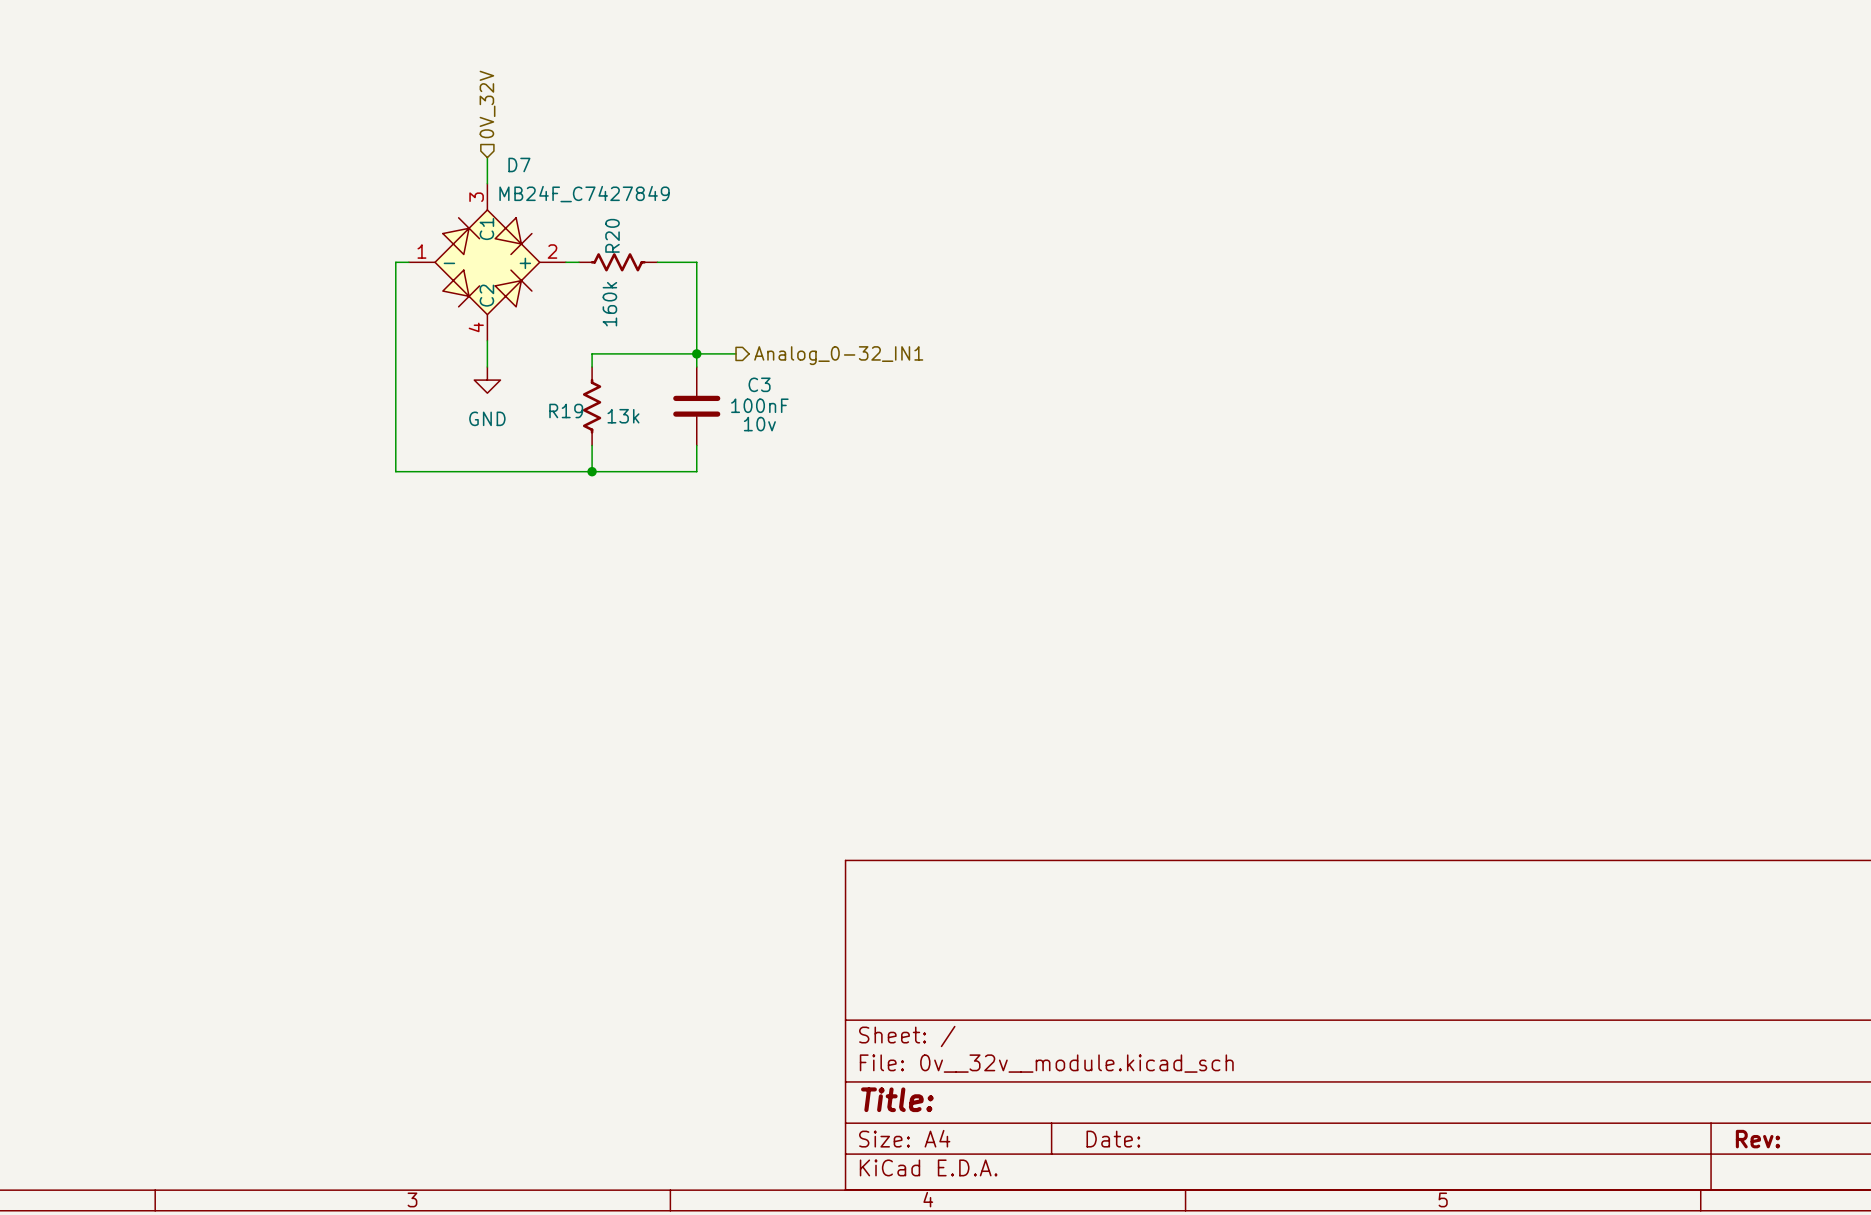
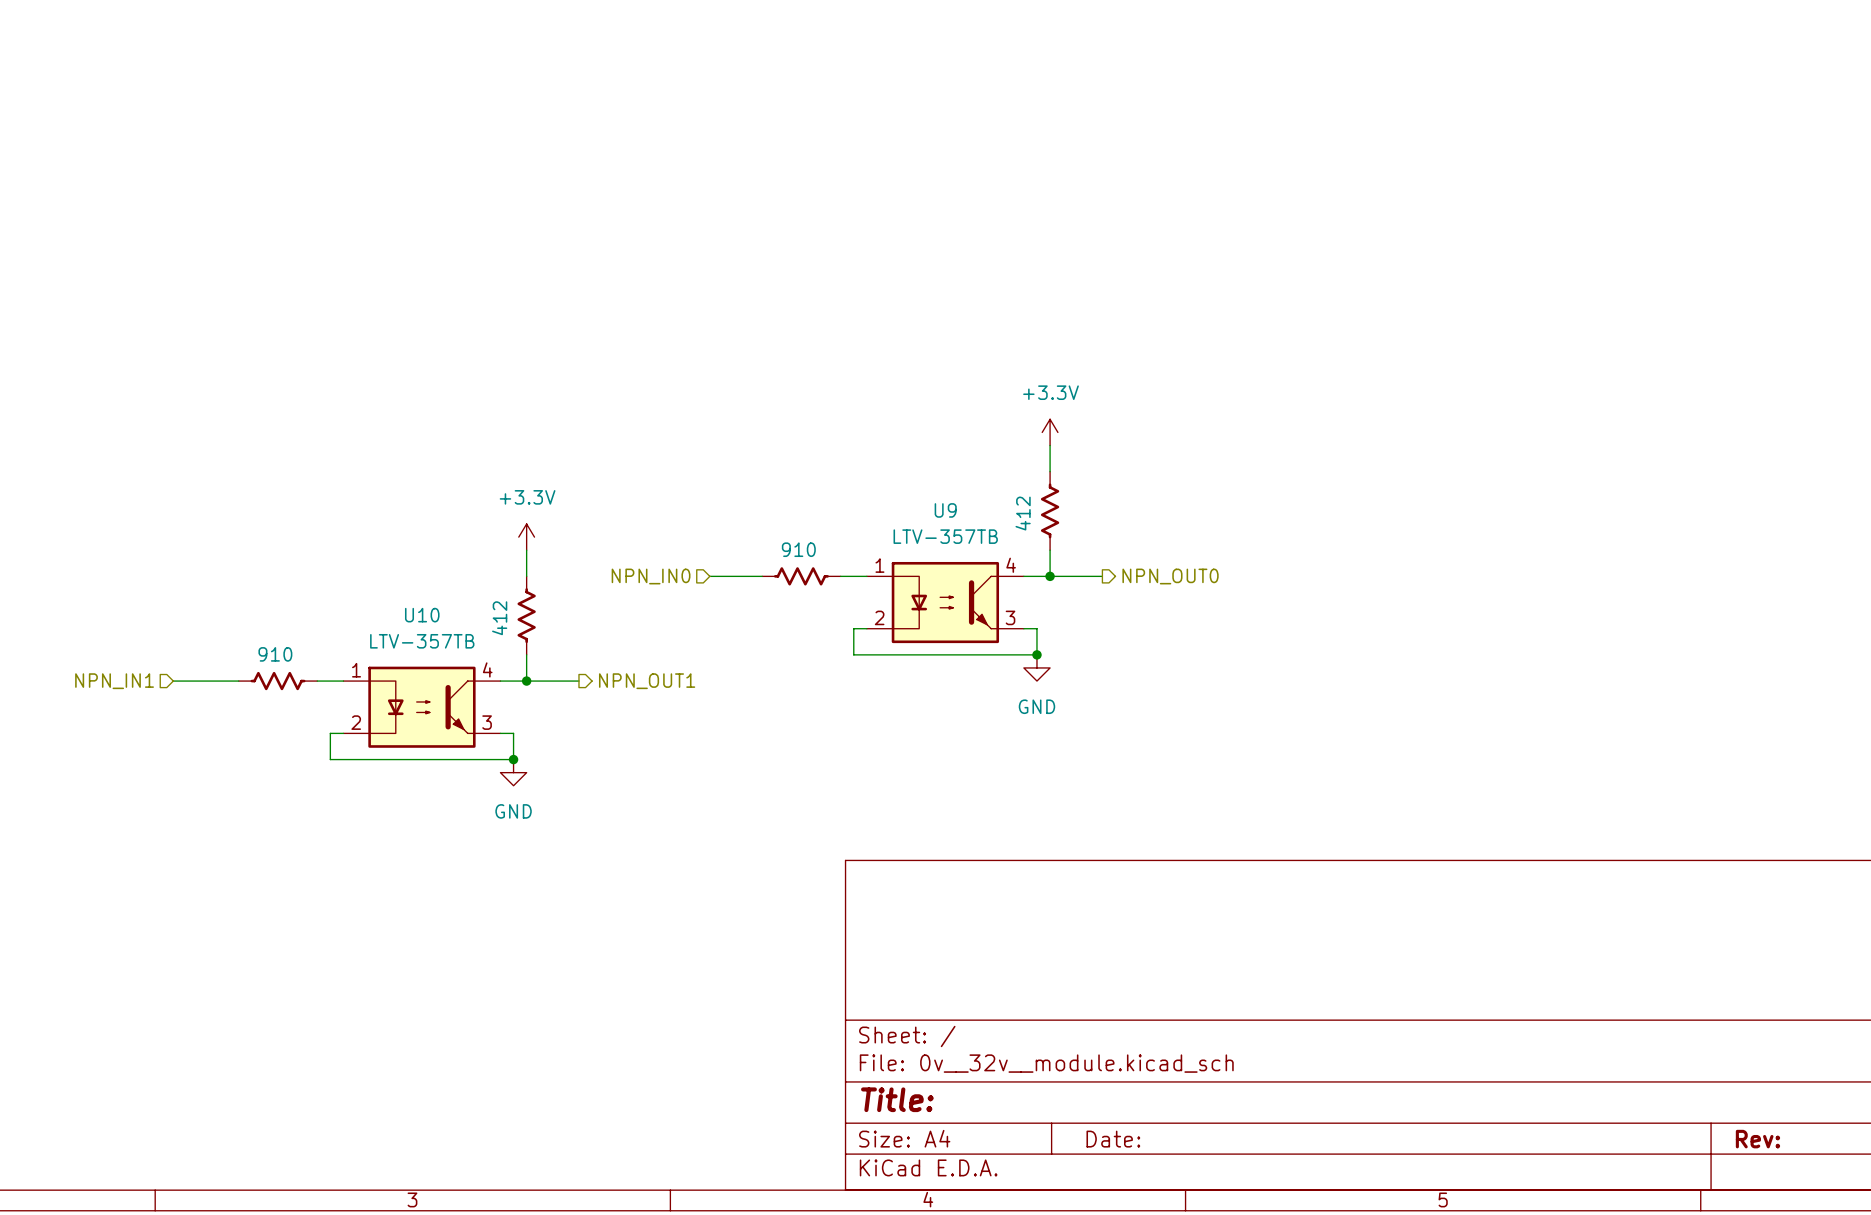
hierarchical label: 0V_32V (487, 104) -> none
wire: (487, 157) (487, 183) -> none
wire: (408, 262) (395, 262) (395, 471) (696, 471) (696, 445) -> none
D7: MB24F_C7427849 (487, 262) -> none
wire: (565, 262) (578, 262) -> none
R20: (618, 262) -> none
wire: (657, 262) (696, 262) (696, 366) -> none
wire: (487, 340) (487, 366) -> none
junction: (696, 353) -> none
wire: (736, 353) (592, 353) (592, 366) -> none
hierarchical label: Analog_0-32_IN1 (838, 355) -> none
power symbol: GND (487, 380) -> none
R19: (592, 406) -> none
C3: (696, 406) -> none
power symbol: none -> +3.3V (1050, 432)
wire: (592, 445) (592, 471) -> (526, 550) (526, 576)
wire: none -> (1050, 445) (1050, 471)
junction: (592, 471) -> none
part: none -> (1050, 510)
power symbol: none -> +3.3V (526, 537)
wire: none -> (1050, 550) (1050, 576)
hierarchical label: none -> NPN_IN0 (651, 576)
wire: none -> (709, 576) (762, 576)
part: none -> (801, 576)
wire: none -> (840, 576) (866, 576)
wire: none -> (1023, 576) (1102, 576)
junction: none -> (1050, 576)
hierarchical label: none -> NPN_OUT0 (1170, 576)
U9: none -> LTV-357TB (945, 602)
part: none -> (526, 615)
wire: none -> (866, 628) (853, 628) (853, 654) (1036, 654) (1036, 628) (1023, 628)
wire: none -> (526, 654) (526, 681)
junction: none -> (1036, 654)
power symbol: none -> GND (1036, 667)
hierarchical label: none -> NPN_IN1 (114, 681)
wire: none -> (173, 681) (238, 681)
part: none -> (278, 681)
wire: none -> (317, 681) (343, 681)
wire: none -> (500, 681) (578, 681)
junction: none -> (526, 681)
hierarchical label: none -> NPN_OUT1 (647, 681)
U10: none -> LTV-357TB (421, 707)
wire: none -> (343, 733) (330, 733) (330, 759) (513, 759) (513, 733) (500, 733)
junction: none -> (513, 759)
power symbol: none -> GND (513, 772)

